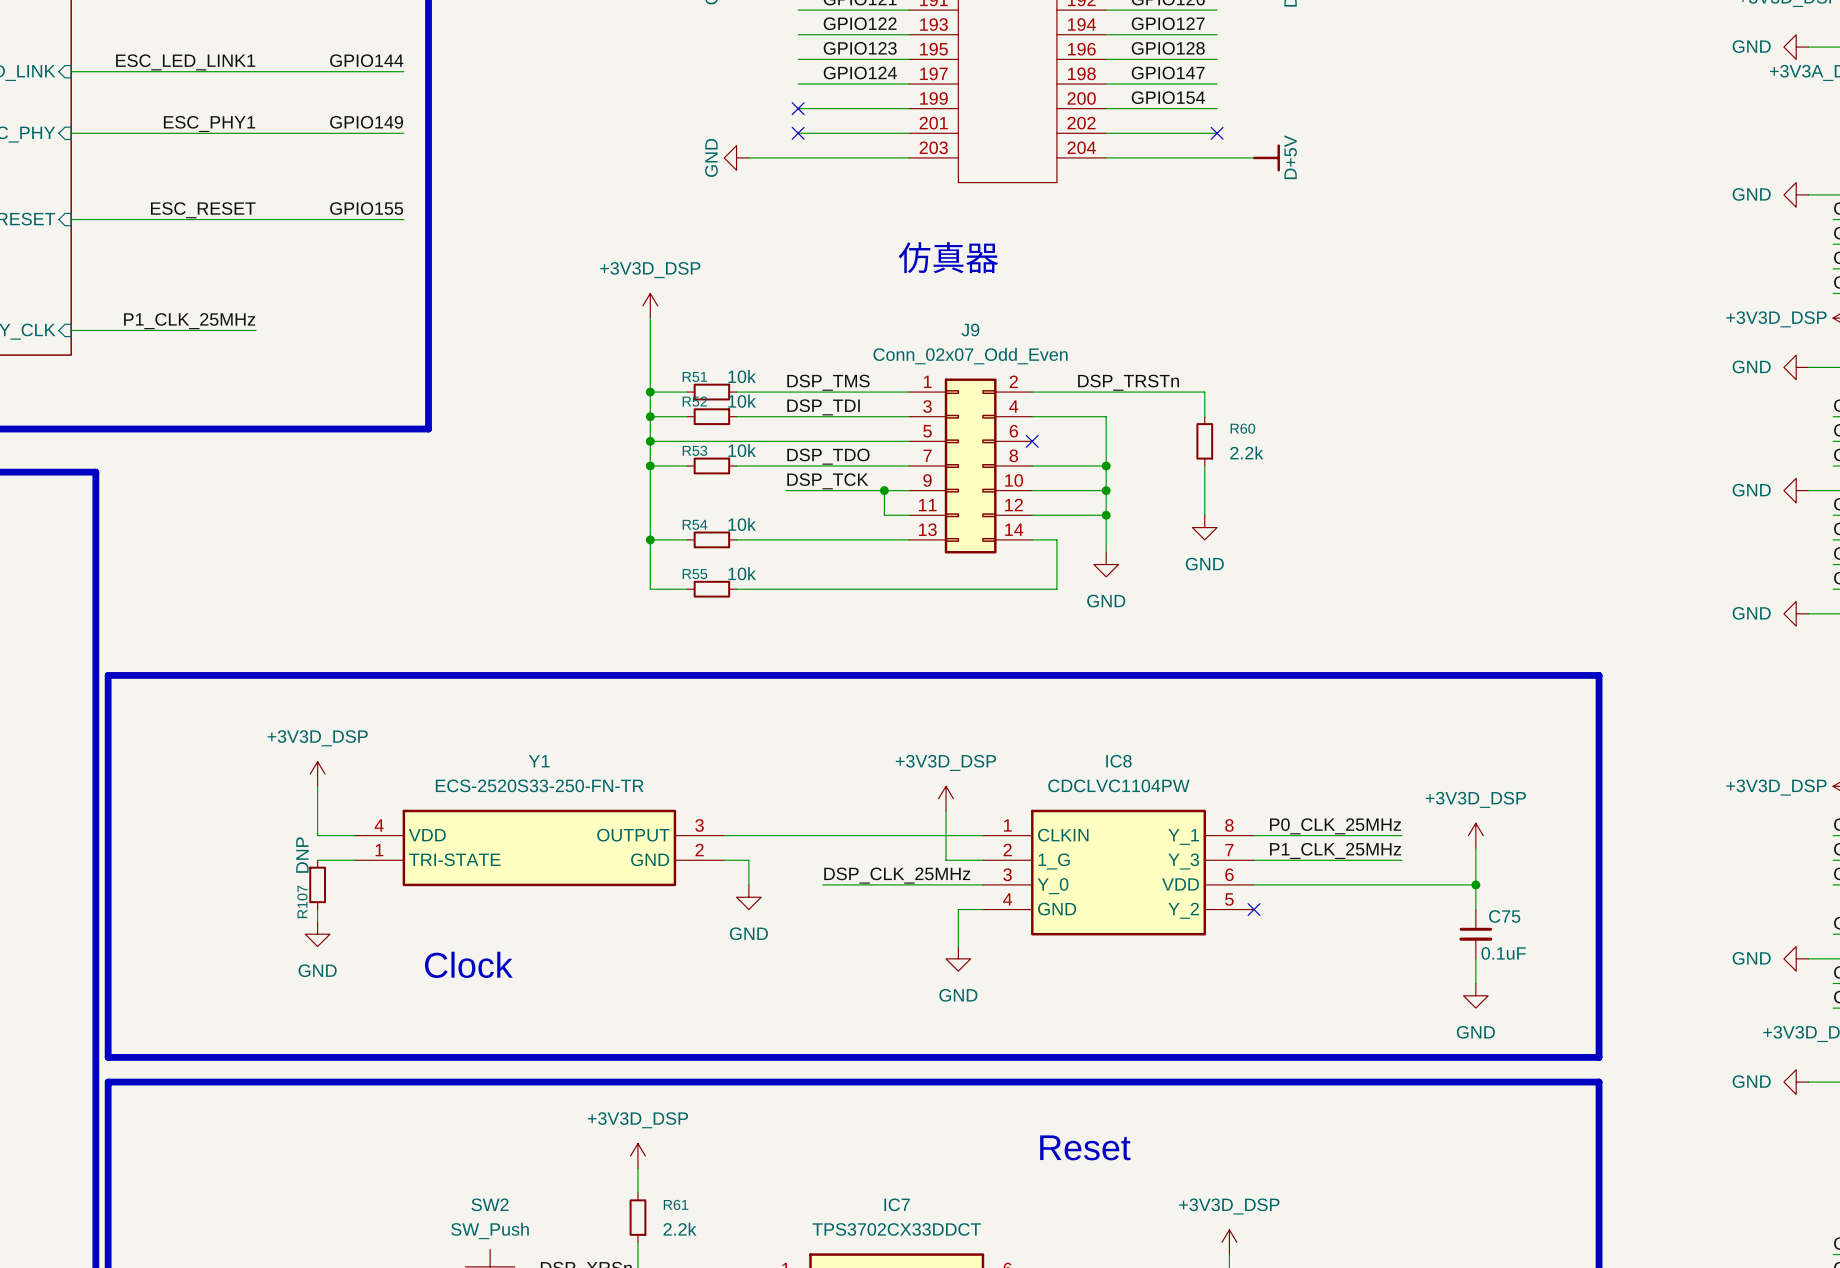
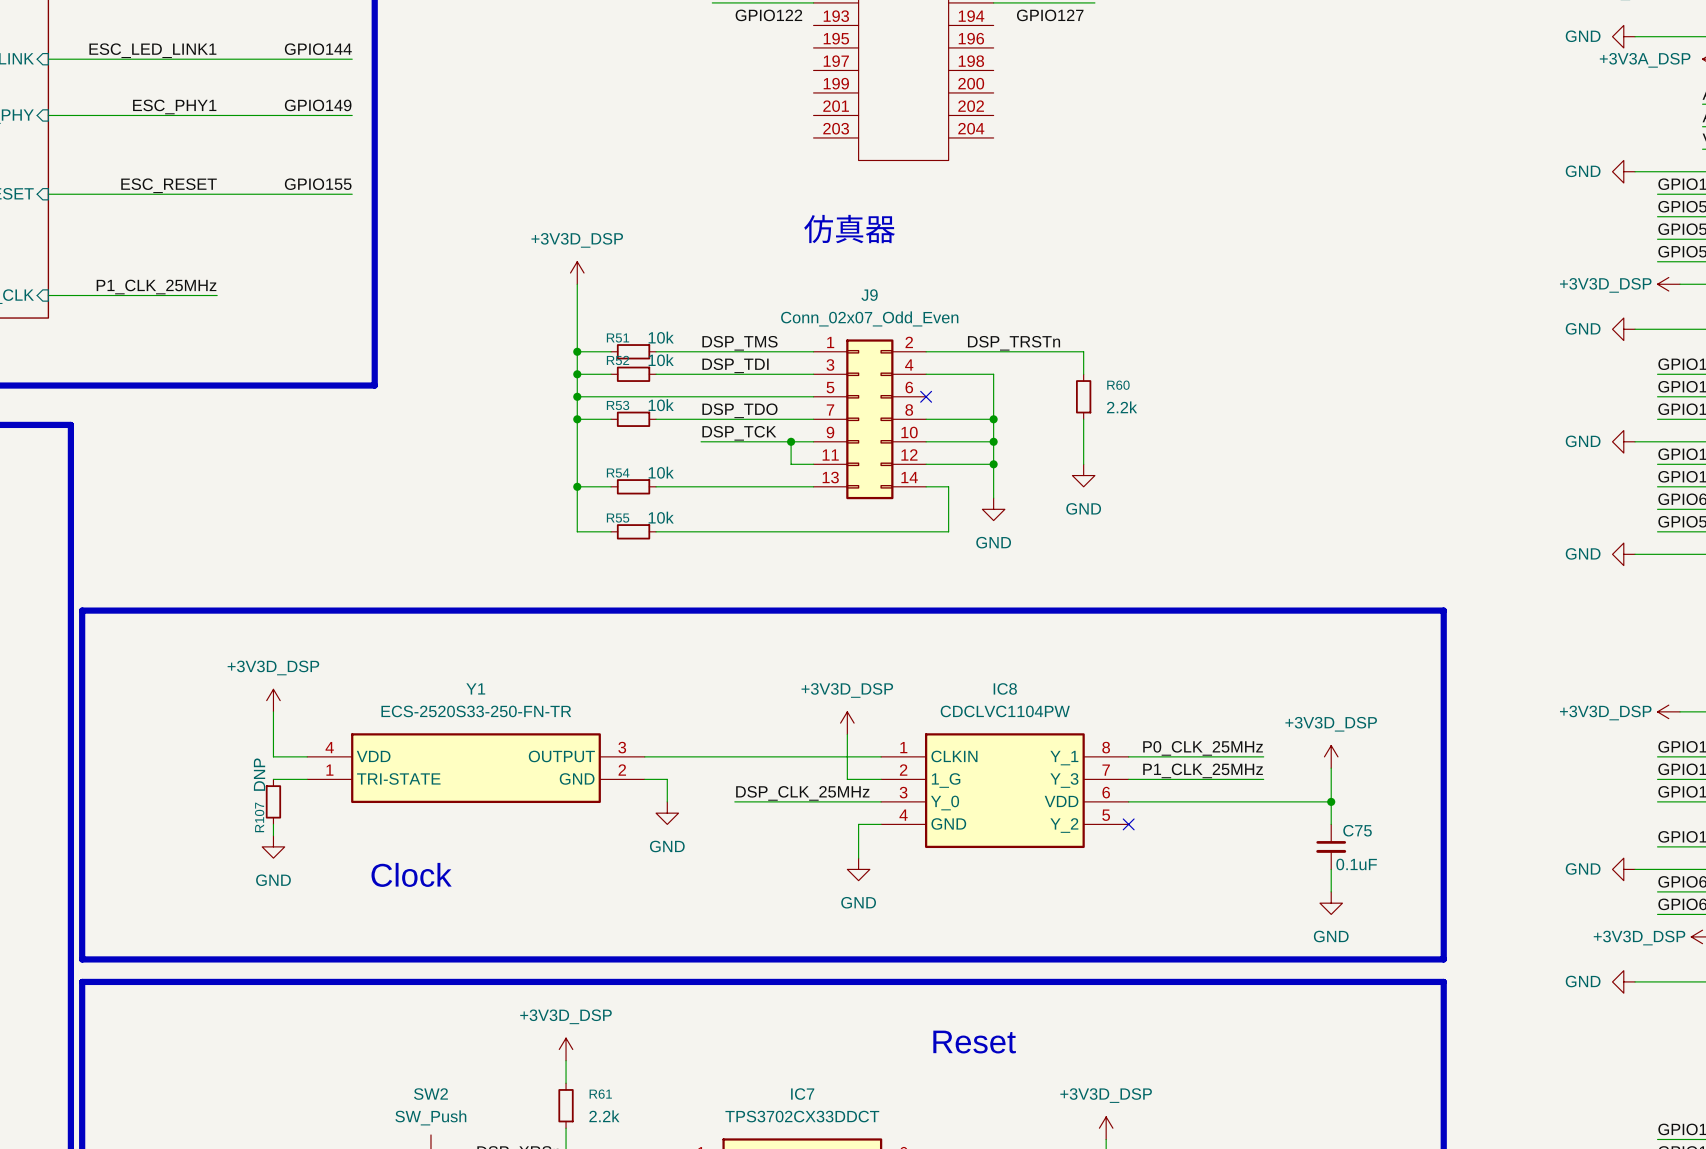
wire: (798, 34) (909, 34) -> none
wire: (1106, 34) (1217, 34) -> none
label: GPIO123 (860, 48) -> none
label: GPIO128 (1168, 48) -> none
wire: (798, 59) (909, 59) -> none
wire: (1106, 59) (1217, 59) -> none
label: GPIO124 (860, 73) -> none
label: GPIO147 (1168, 73) -> none
wire: (798, 84) (909, 84) -> none
wire: (1106, 84) (1217, 84) -> none
label: GPIO154 (1168, 97) -> none
wire: (798, 108) (909, 108) -> none
no-connect mark: (798, 108) -> none
wire: (1106, 108) (1217, 108) -> none
wire: (798, 133) (909, 133) -> none
no-connect mark: (798, 133) -> none
wire: (1106, 133) (1217, 133) -> none
no-connect mark: (1217, 133) -> none
power symbol: GND (736, 157) -> none
wire: (748, 157) (909, 157) -> none
wire: (1106, 157) (1254, 157) -> none
power symbol: D+5V (1266, 157) -> none

